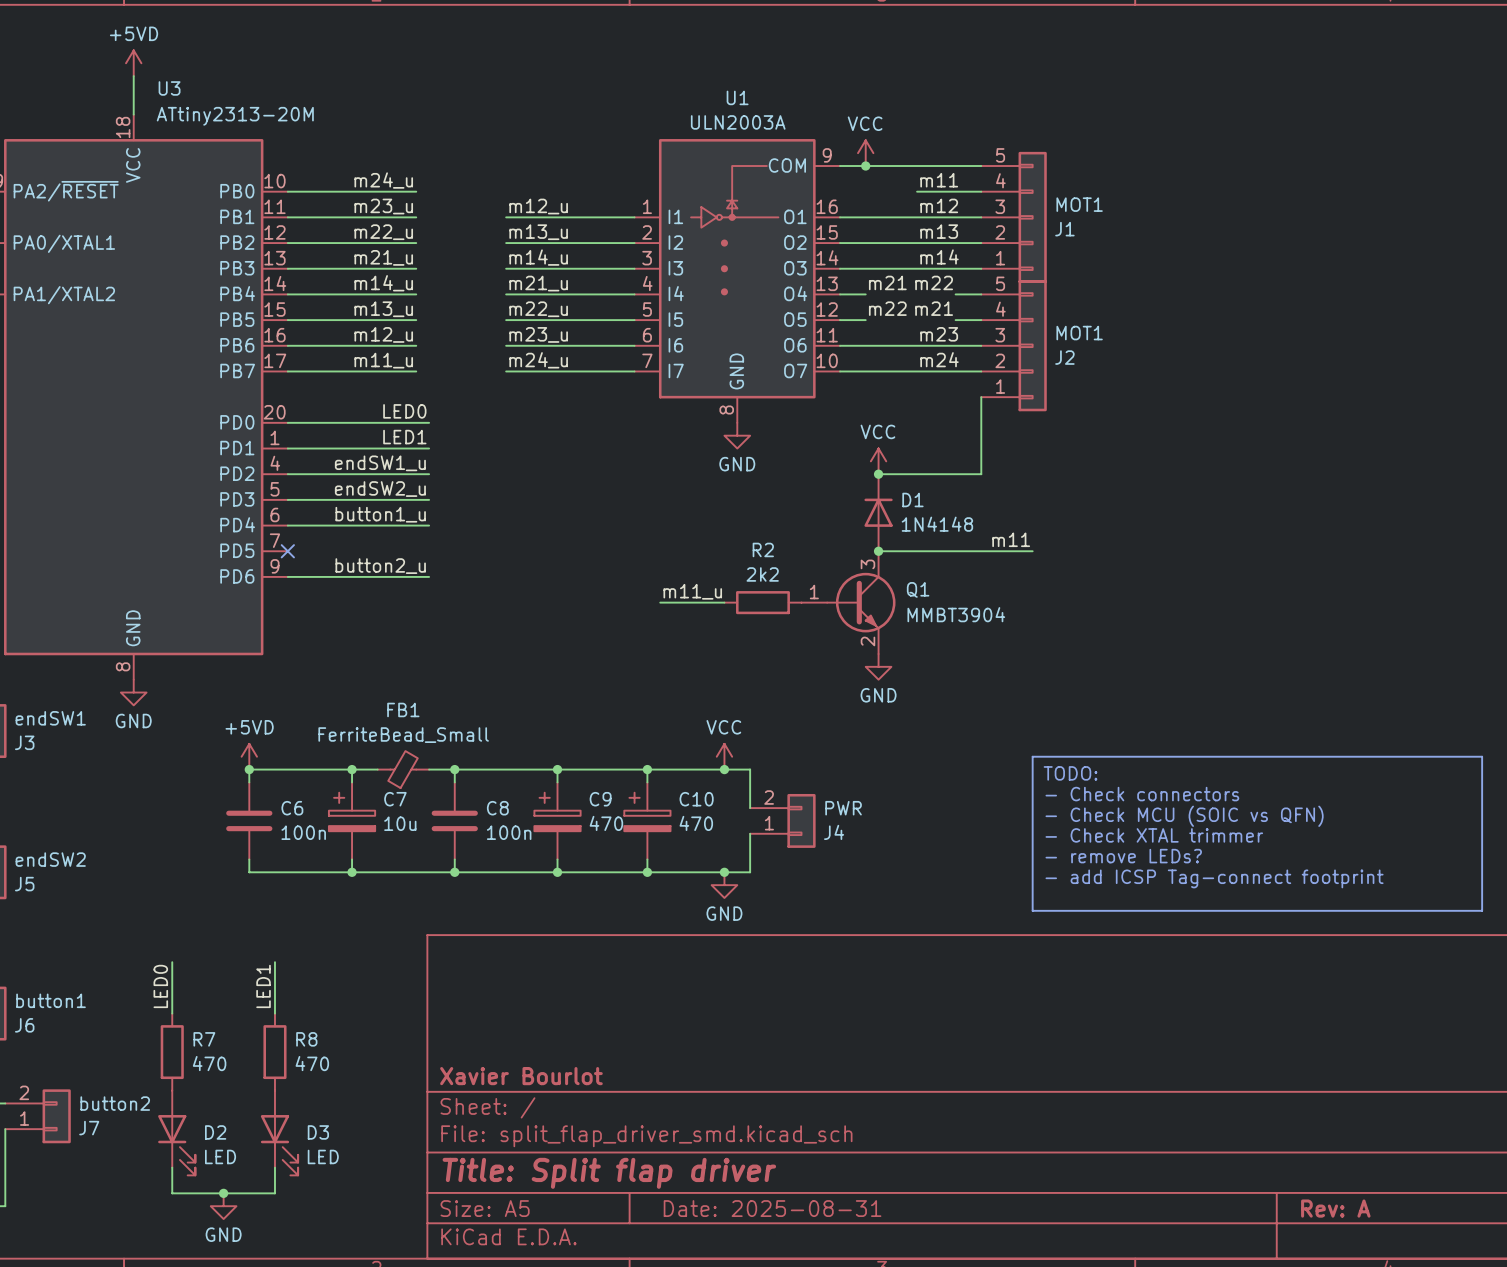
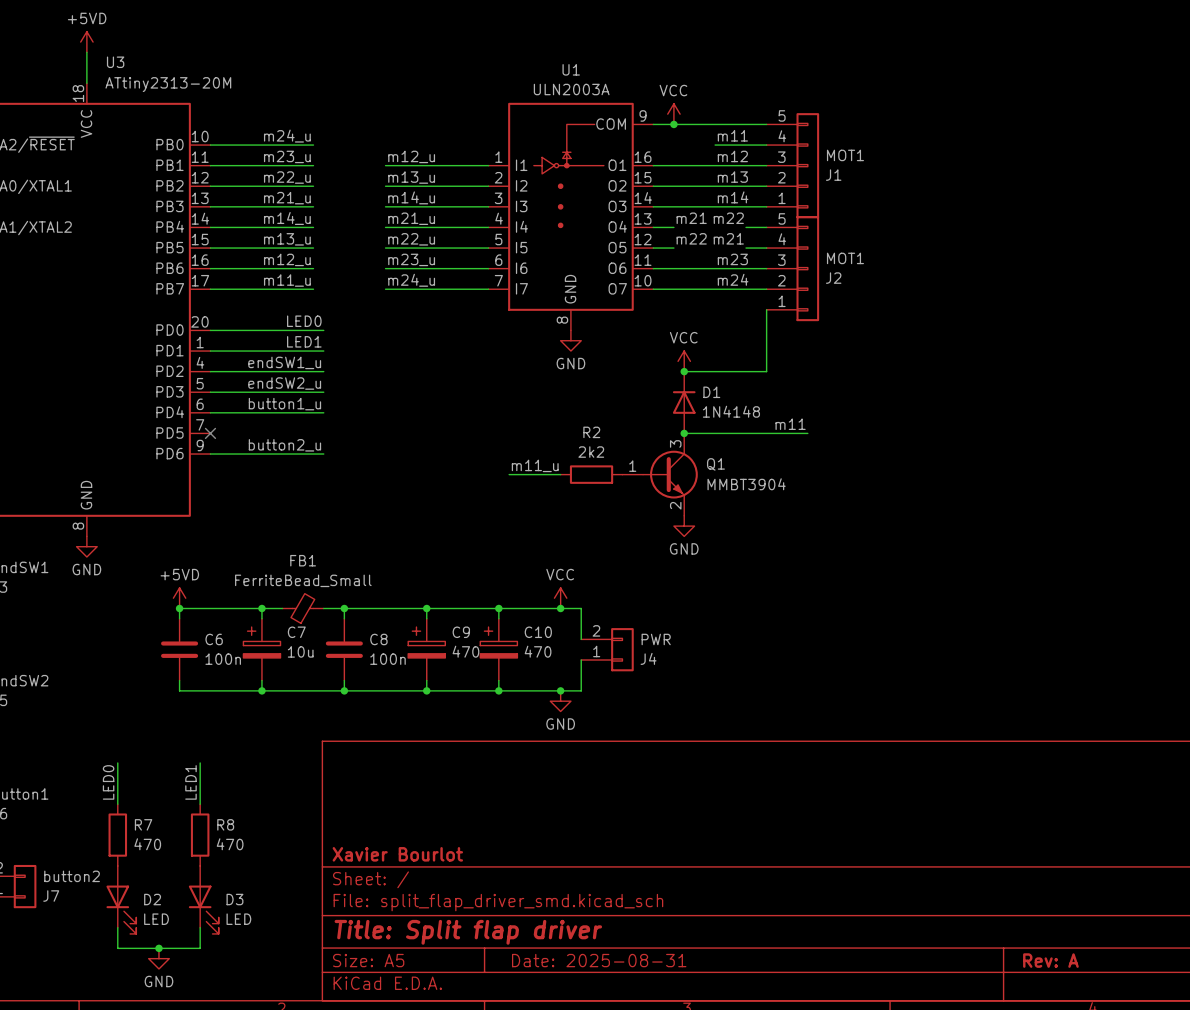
line: (1032, 756) (1482, 756) (1482, 910) (1032, 910) (1032, 756) -> none
text: TODO: (1070, 773) -> none
text: - Check connectors (1142, 794) -> none
text: - Check MCU (SOIC vs QFN) (1184, 816) -> none
text: - Check XTAL trimmer (1154, 835) -> none
text: - remove LEDs? (1123, 856) -> none
text: - add ICSP Tag-connect footprint (1214, 878) -> none

